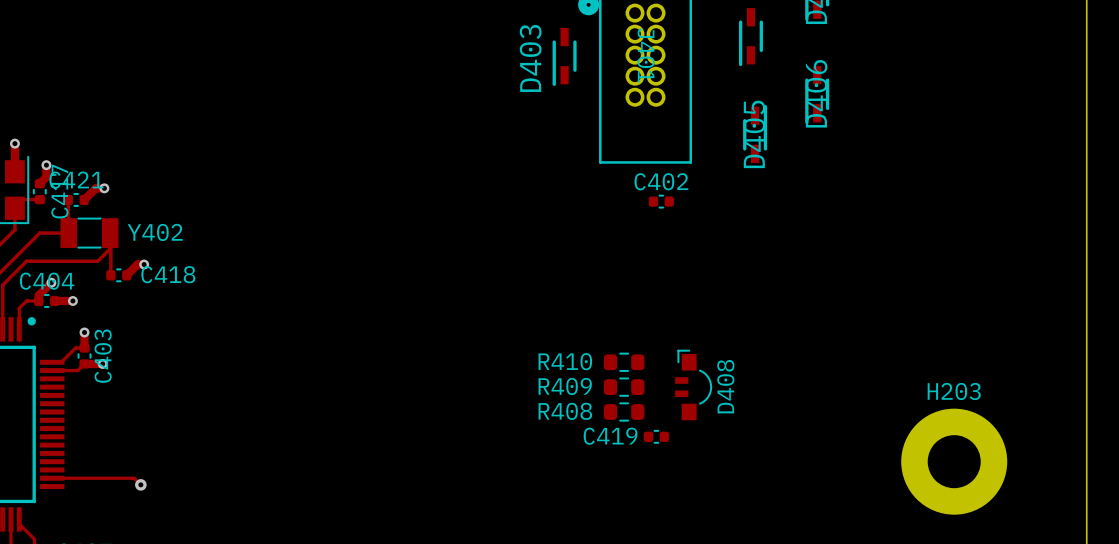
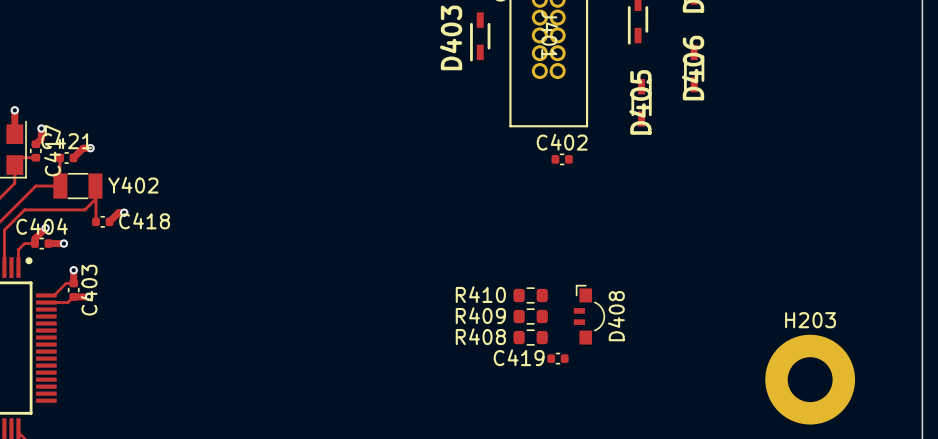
track: (52, 478) (134, 478) (140, 484) -> none
via: (140, 484) -> none

